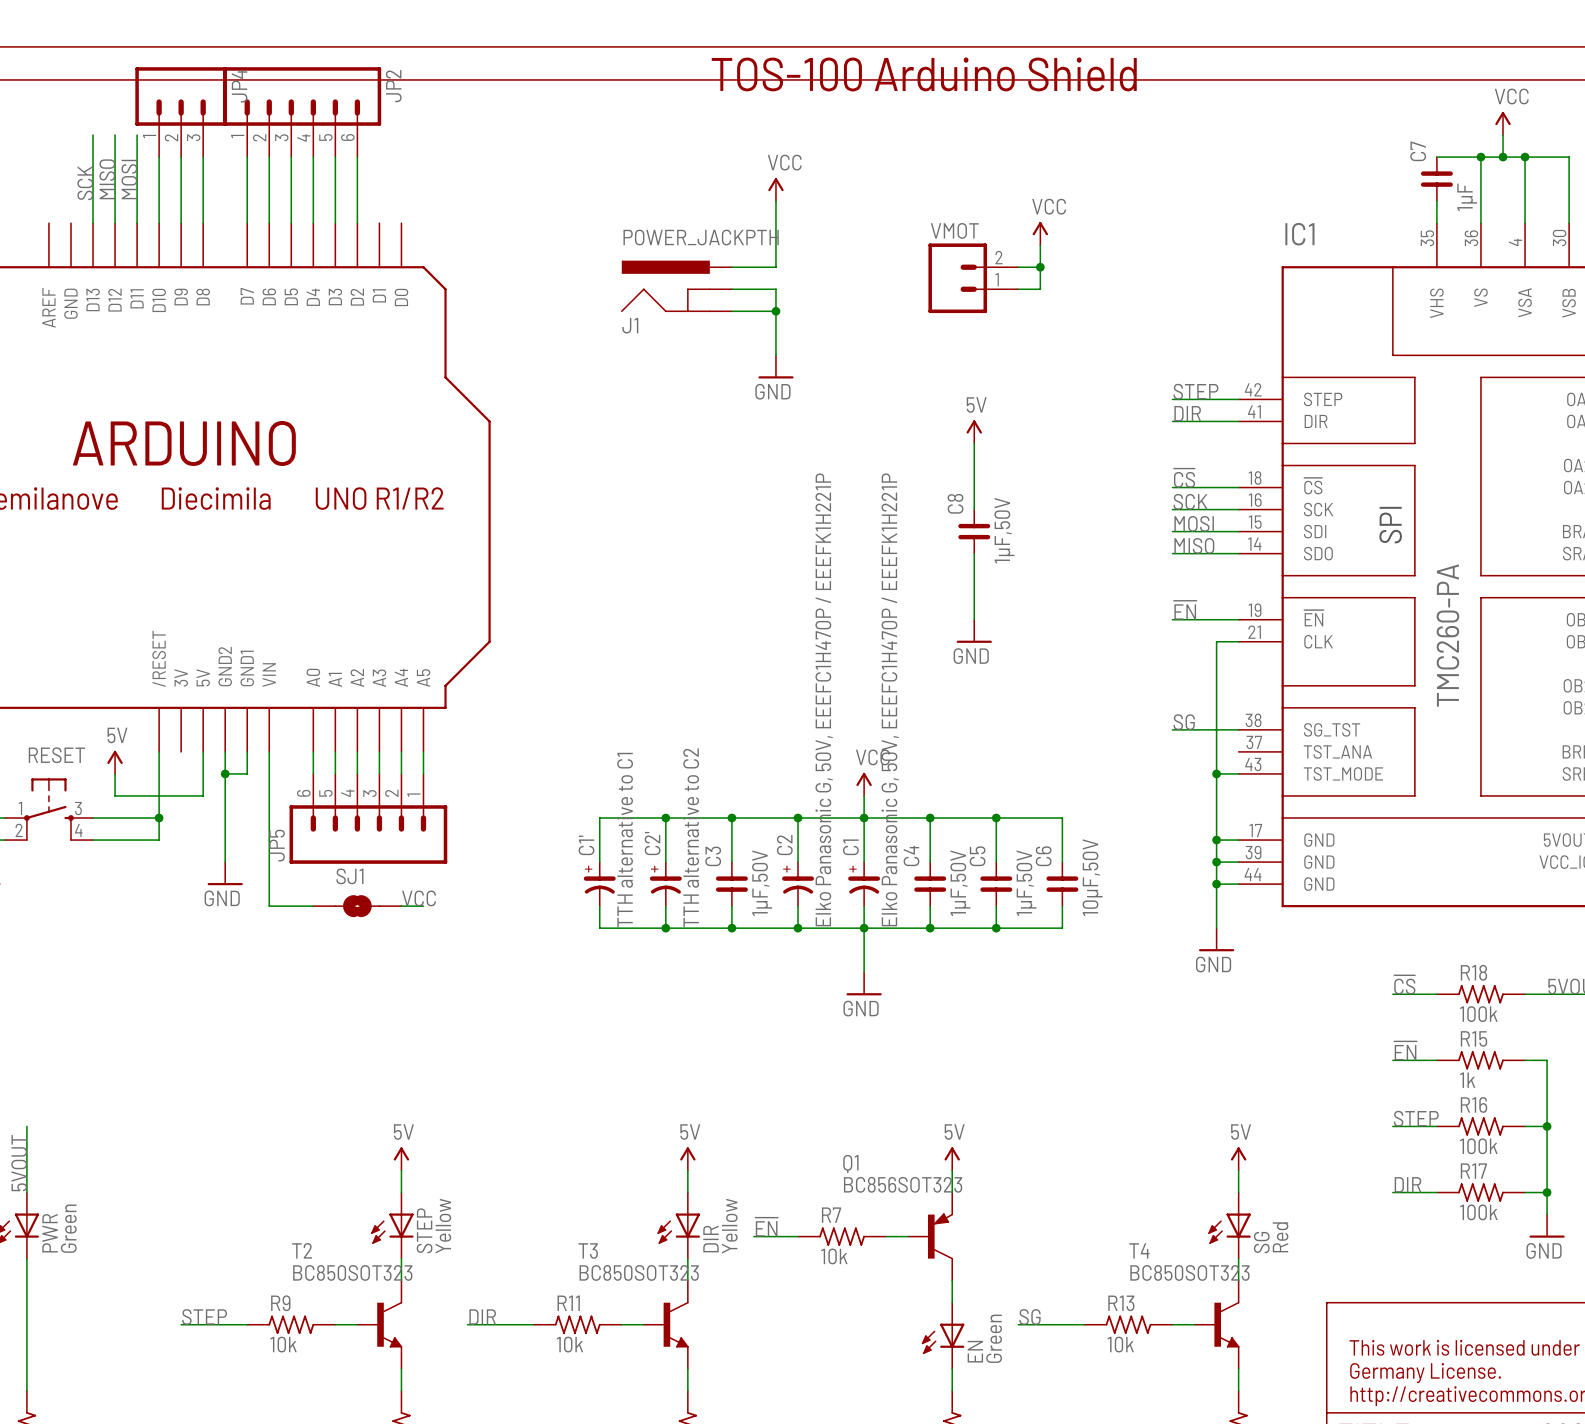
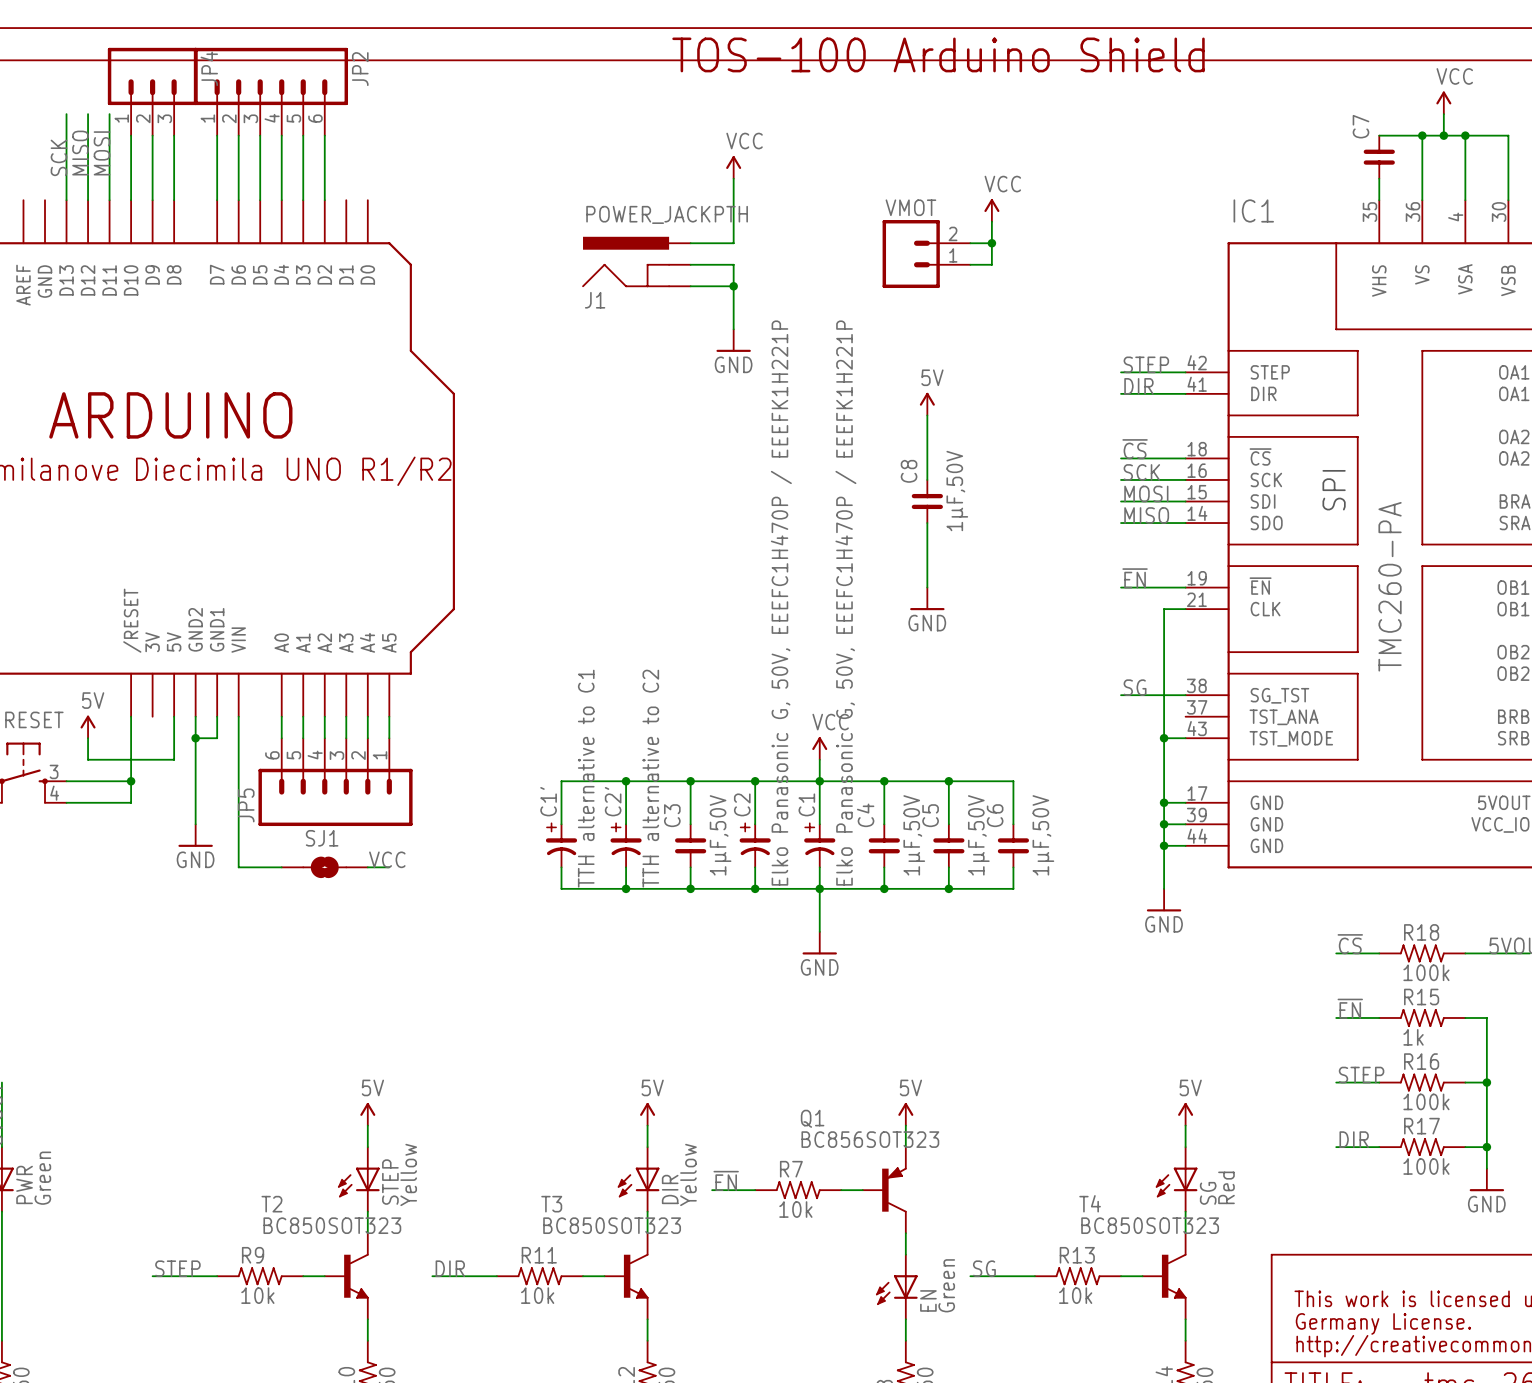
C7 value: 1µF (1467, 197) -> none
C6 value: 10µF,50V (1092, 877) -> 1µF,50V (1043, 835)

